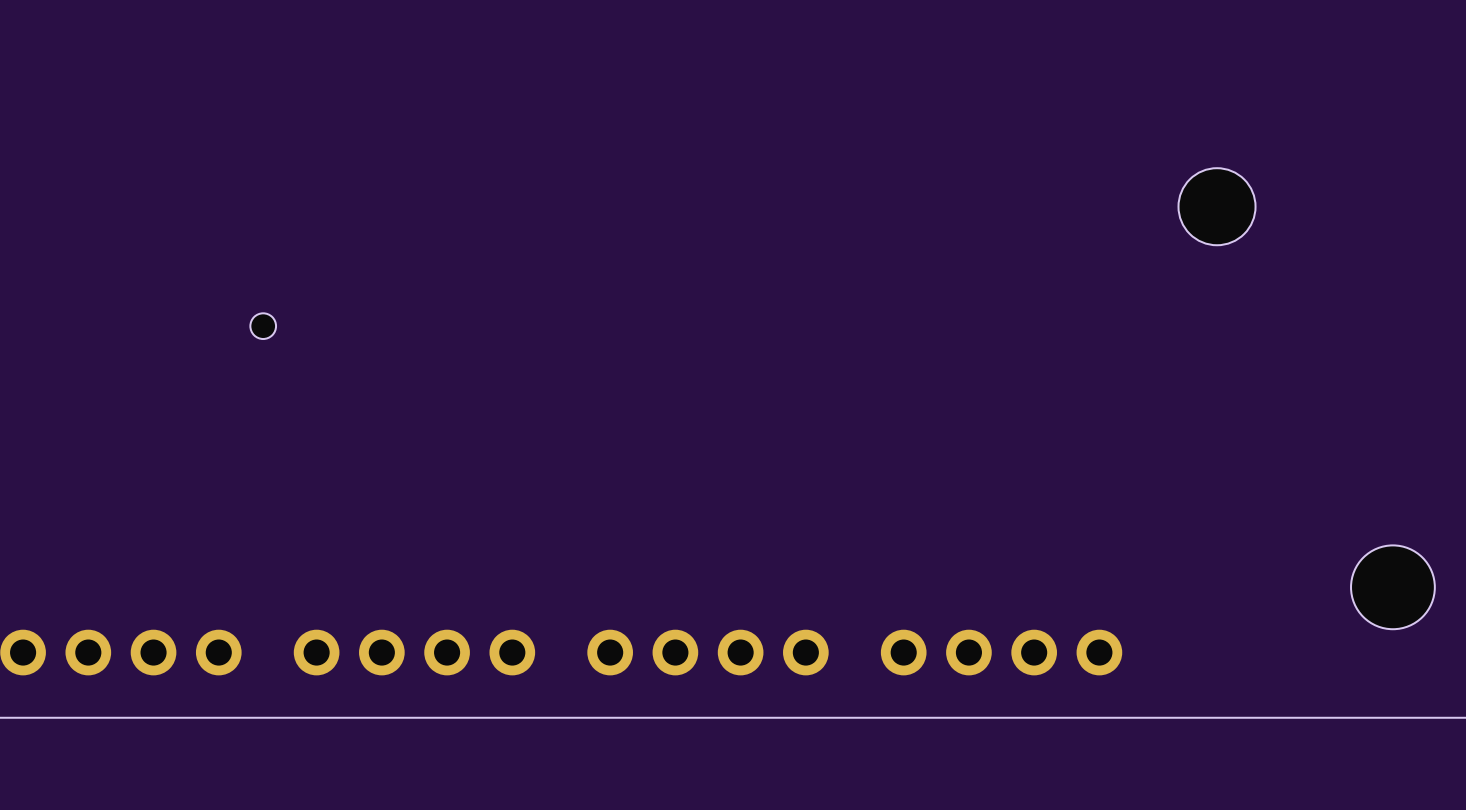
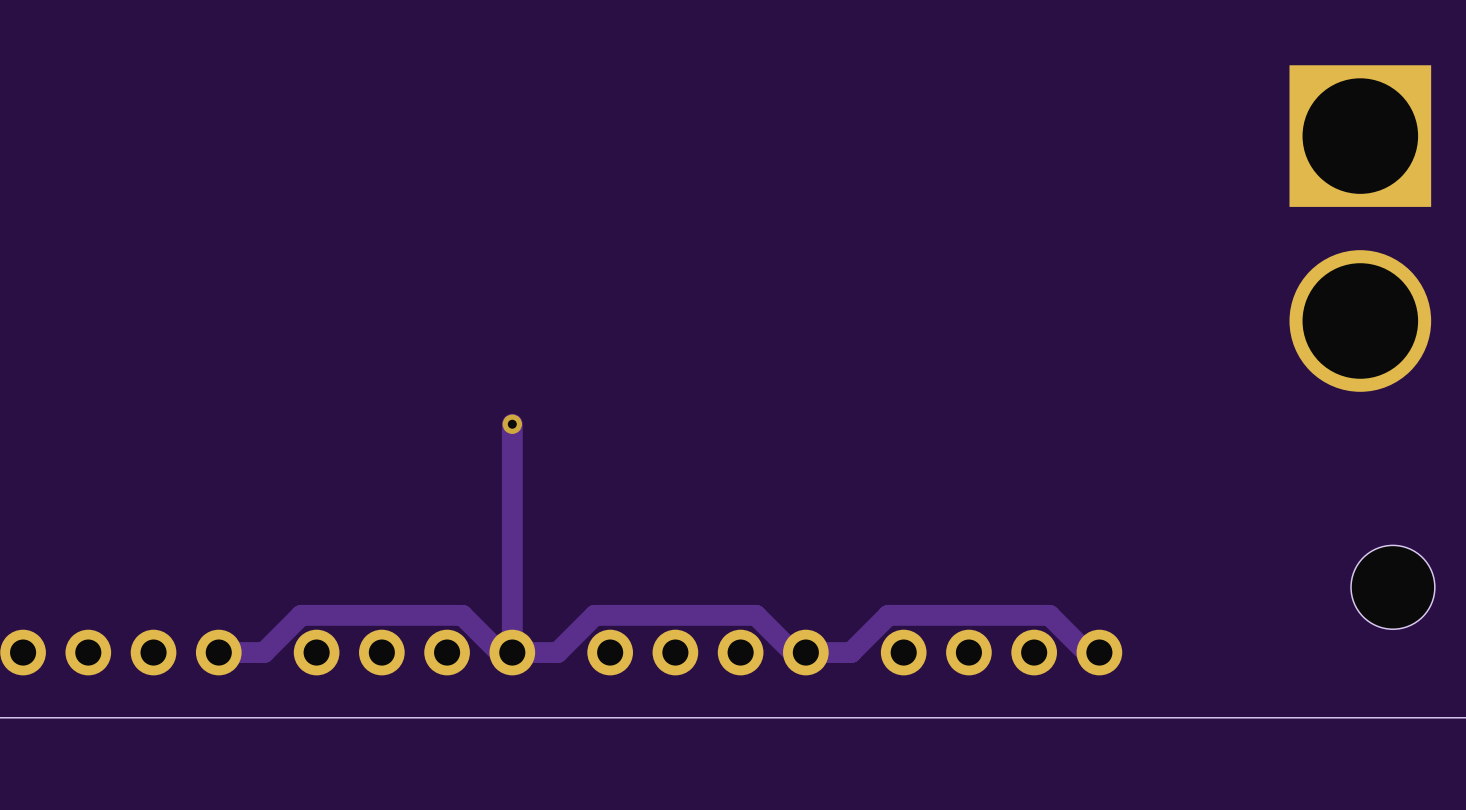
part: (1217, 206) -> none
part: none -> (1360, 228)
part: (263, 326) -> none
track: none -> (512, 424) (512, 652)
via: none -> (512, 424)
track: none -> (1099, 652) (1086, 652) (1049, 615) (888, 615) (851, 652) (793, 652) (756, 615) (594, 615) (557, 652) (499, 652) (462, 615) (301, 615) (264, 652) (218, 652)

